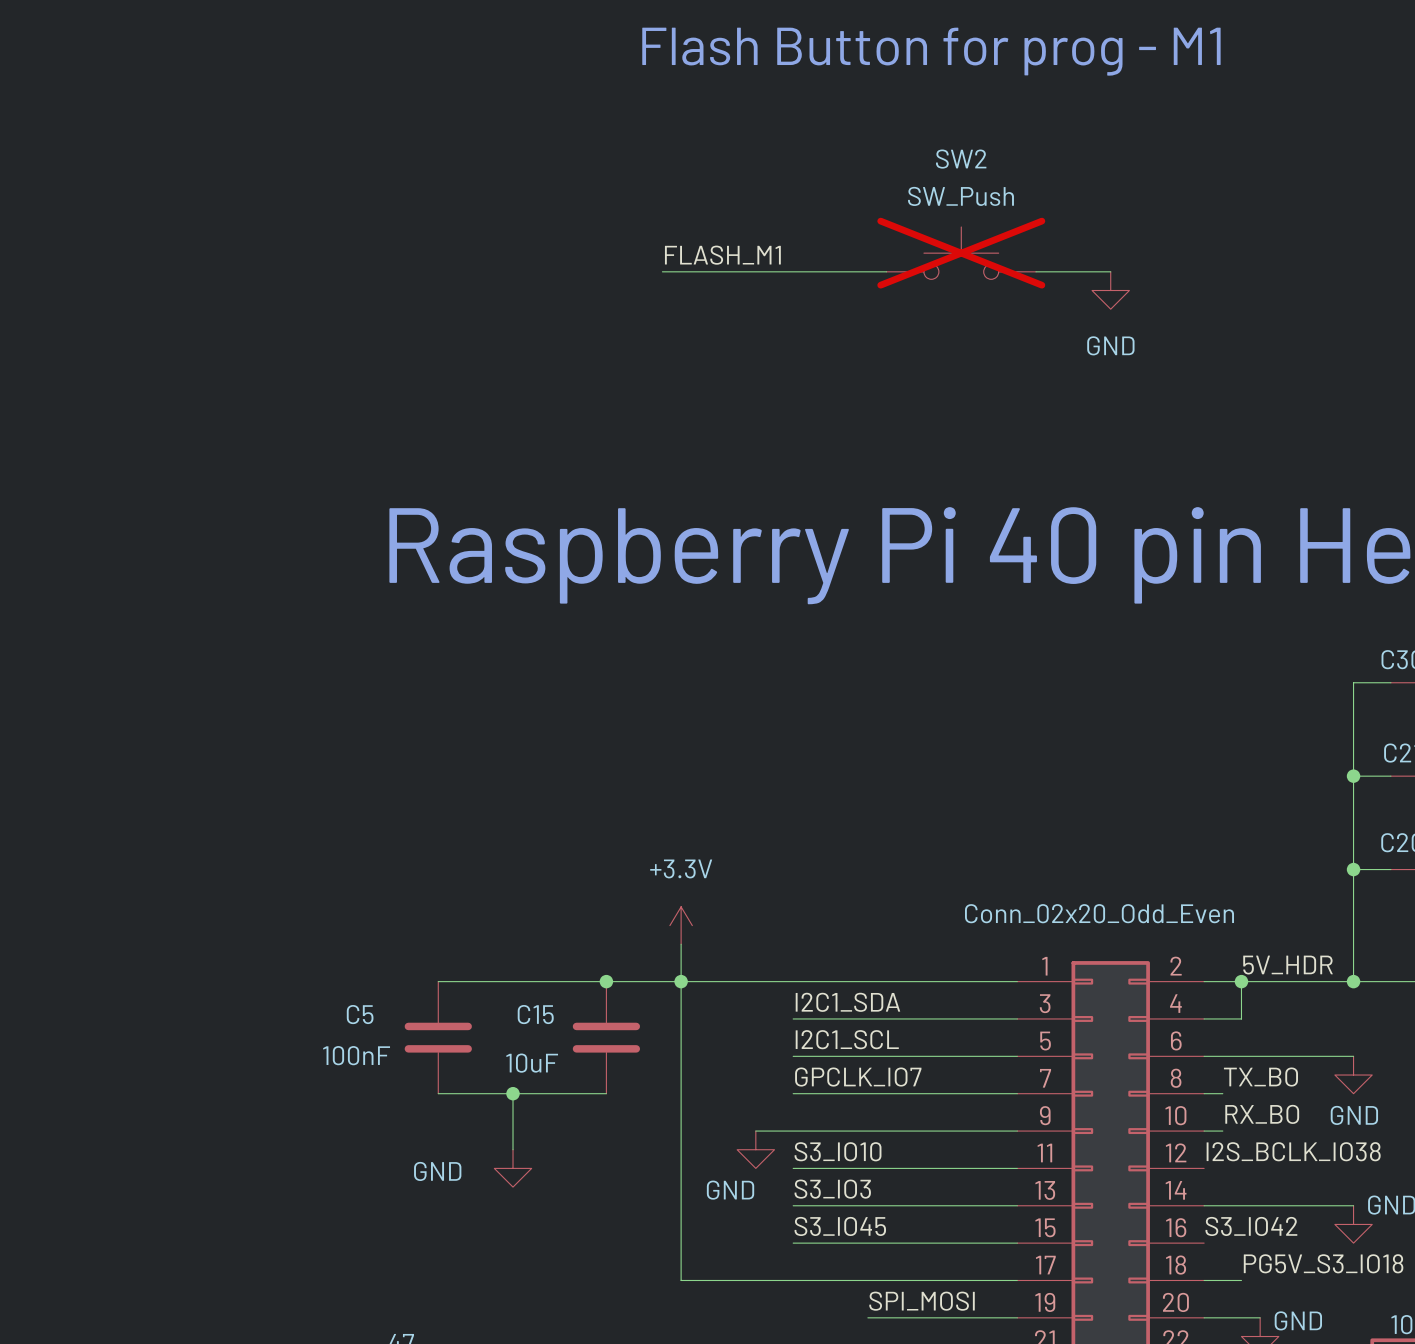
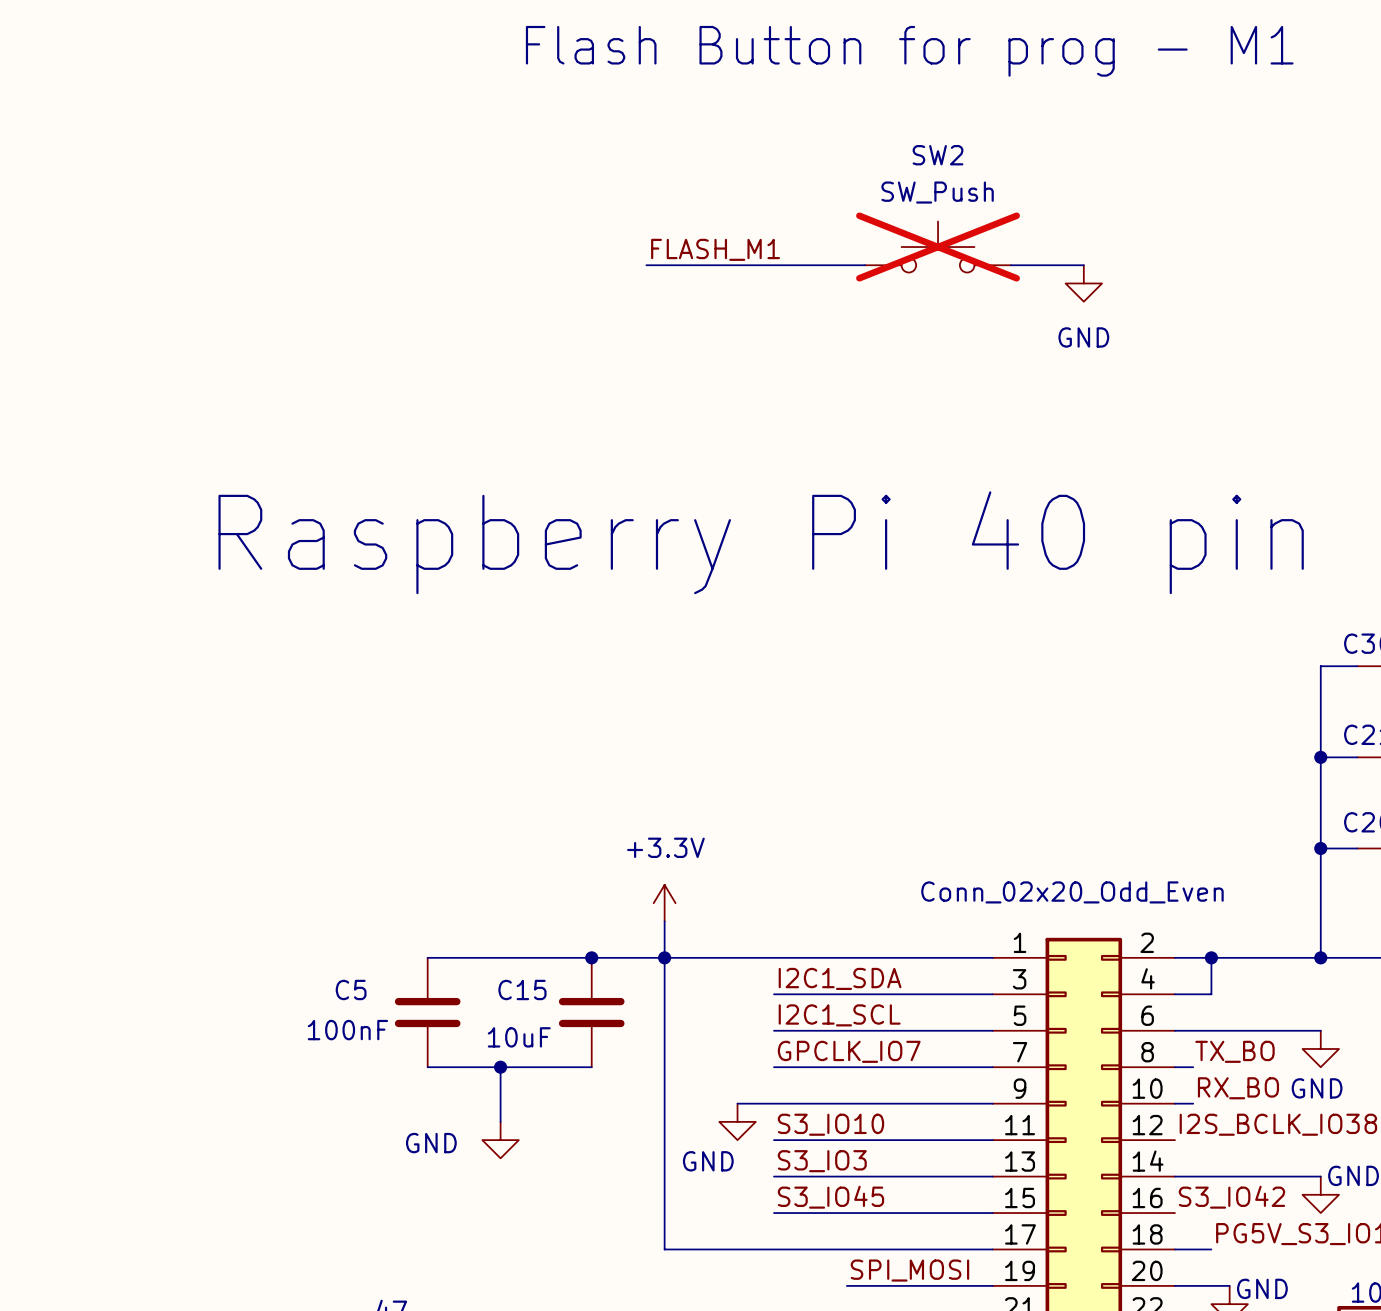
label: 5V_HDR (1288, 965) -> none

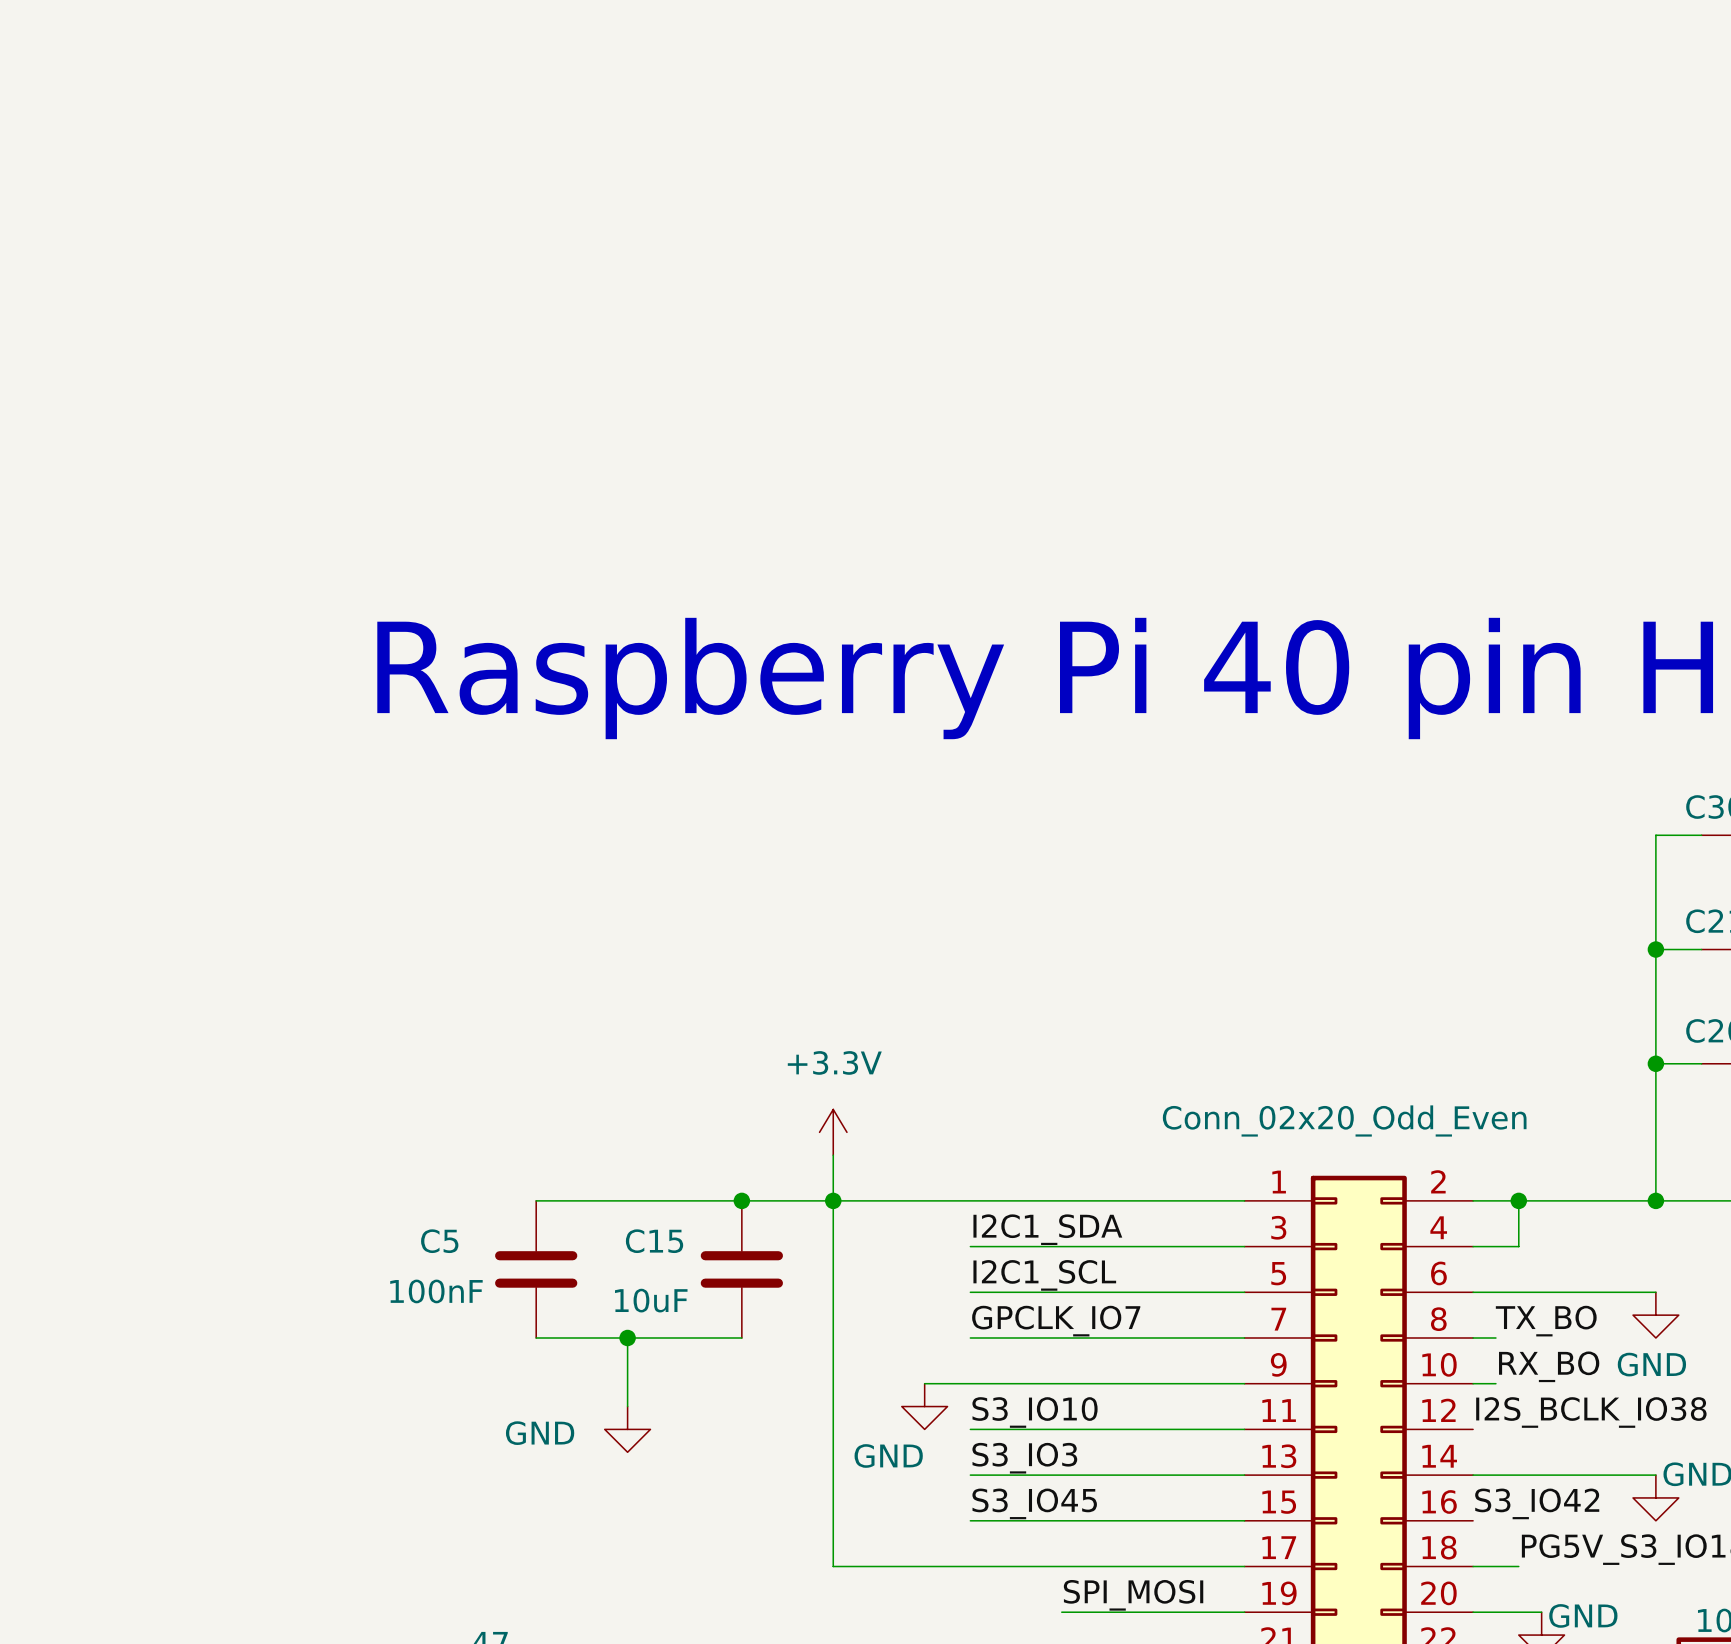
text: Flash Button for prog - M1 (909, 51) -> none
SW2: SW_Push (938, 247) -> none
label: FLASH_M1 (715, 249) -> none
wire: (646, 265) (865, 265) -> none
wire: (1010, 265) (1083, 265) -> none
power symbol: GND (1083, 283) -> none

